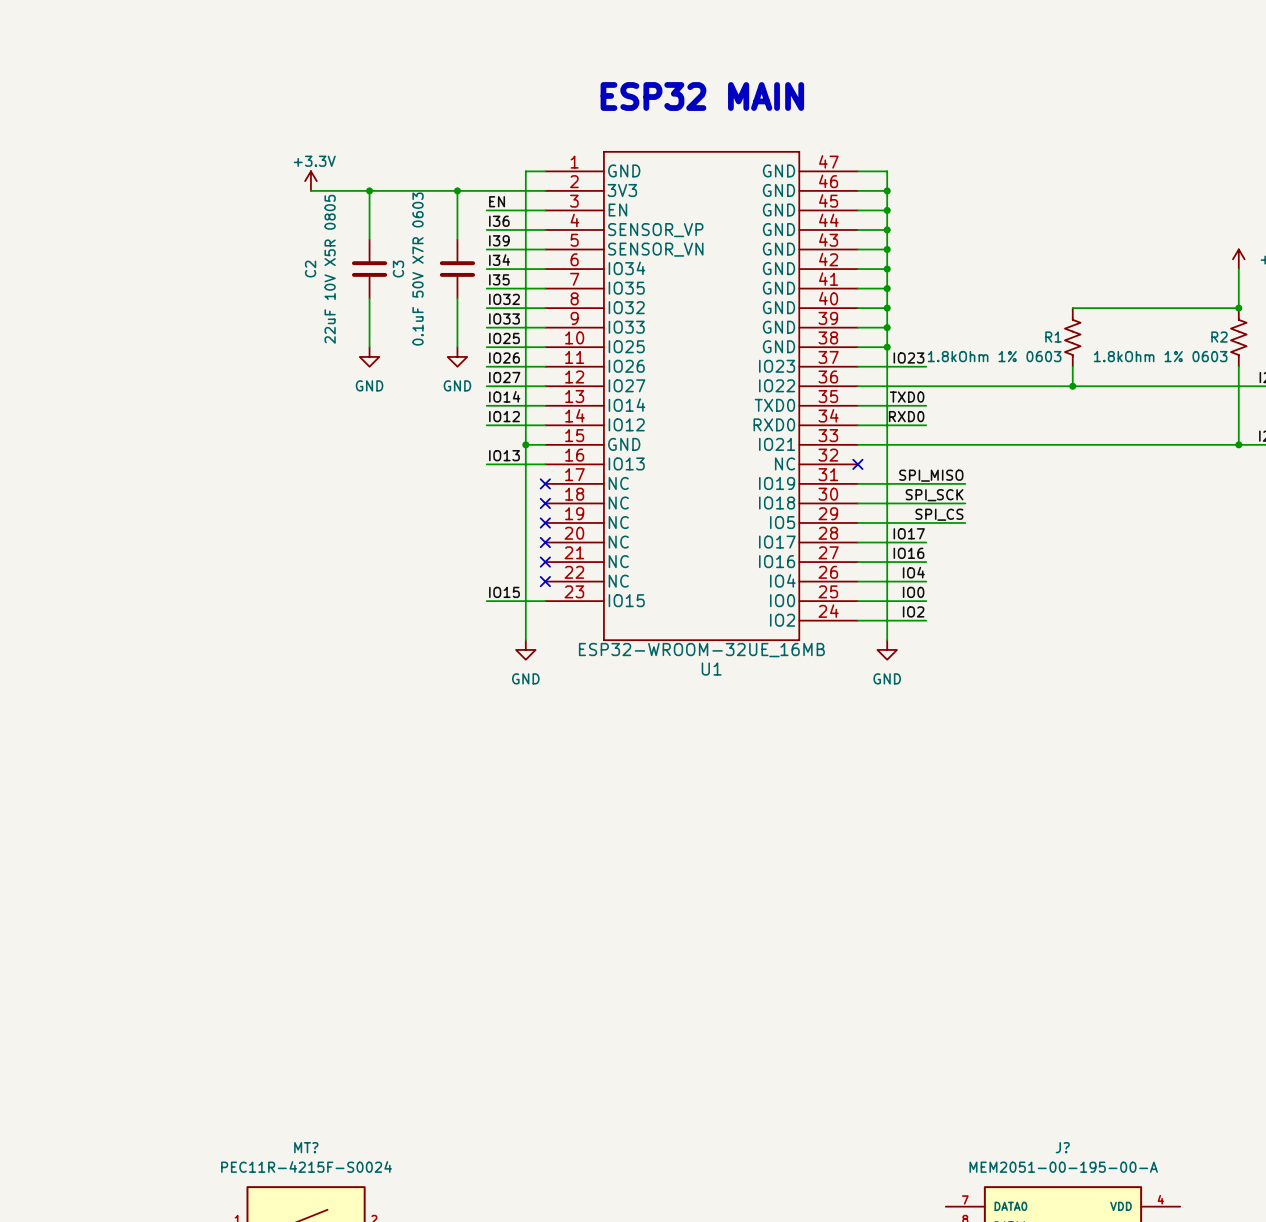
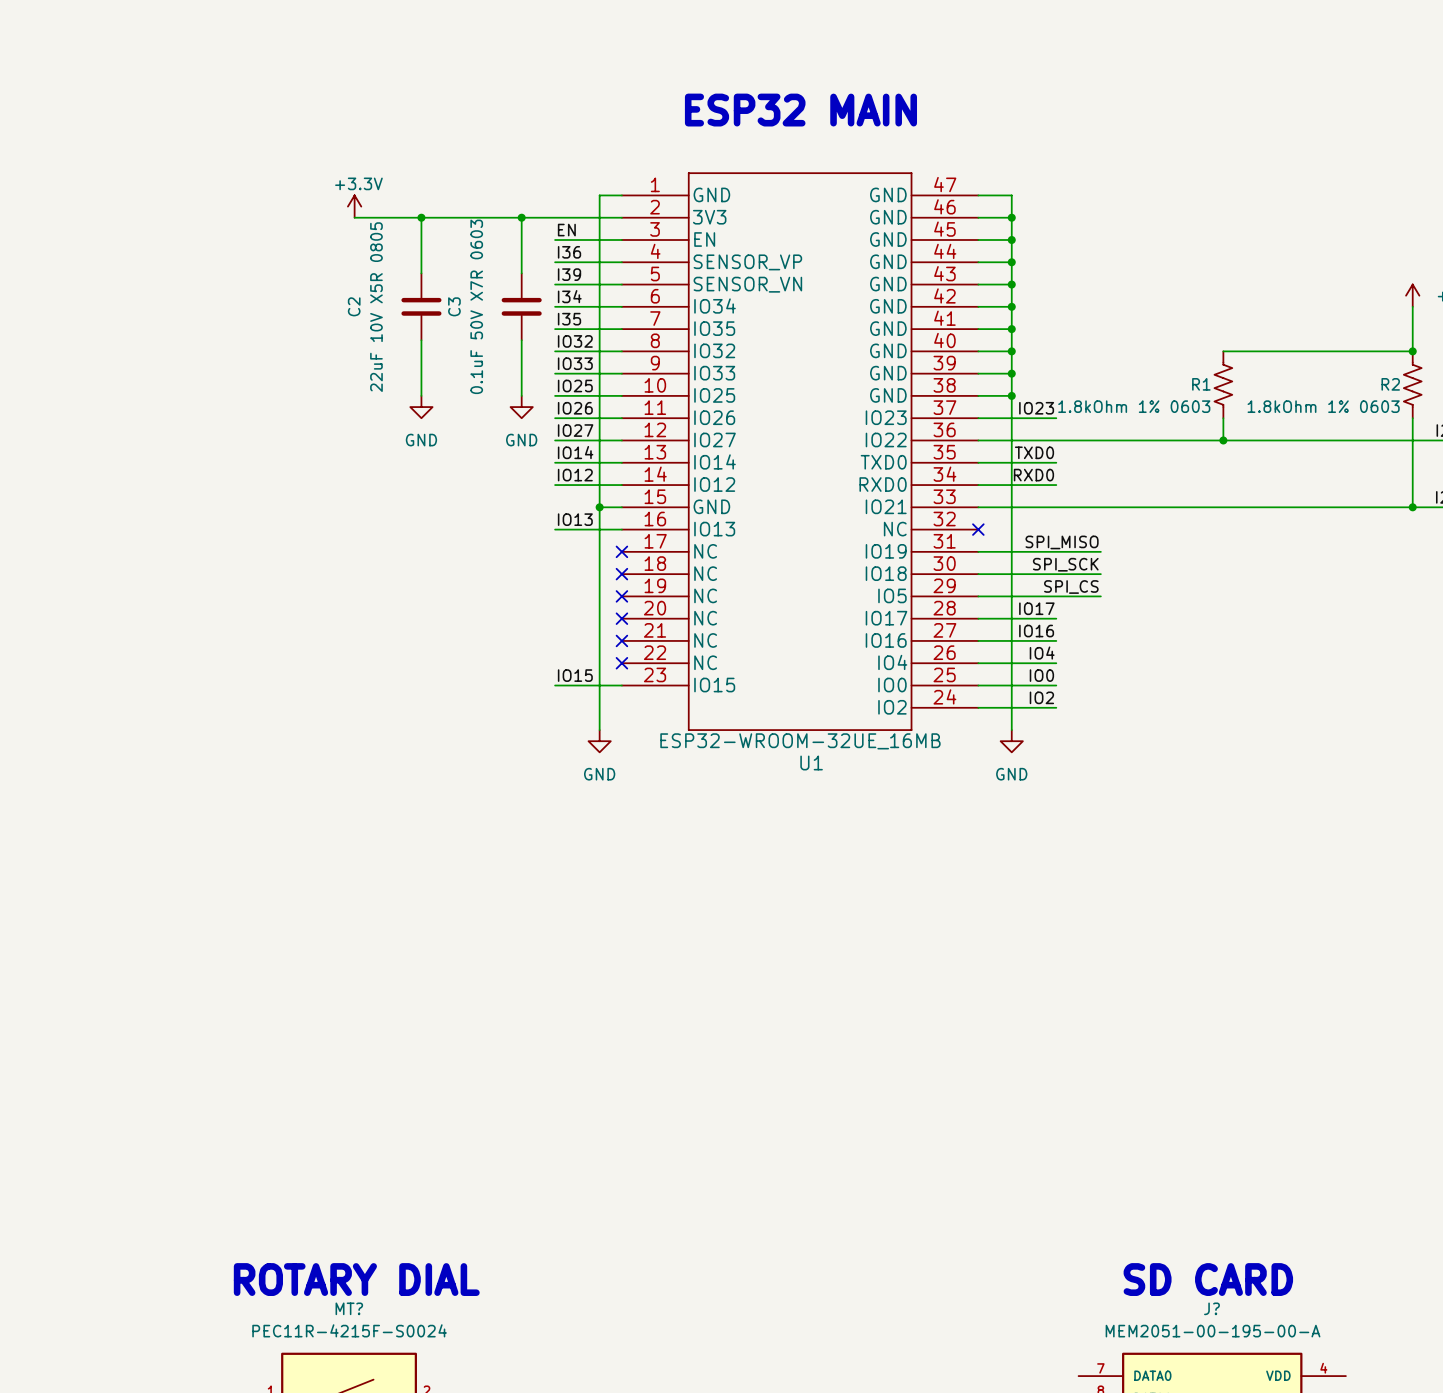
text: none -> ROTARY DIAL (356, 1279)
text: none -> SD CARD (1208, 1279)

